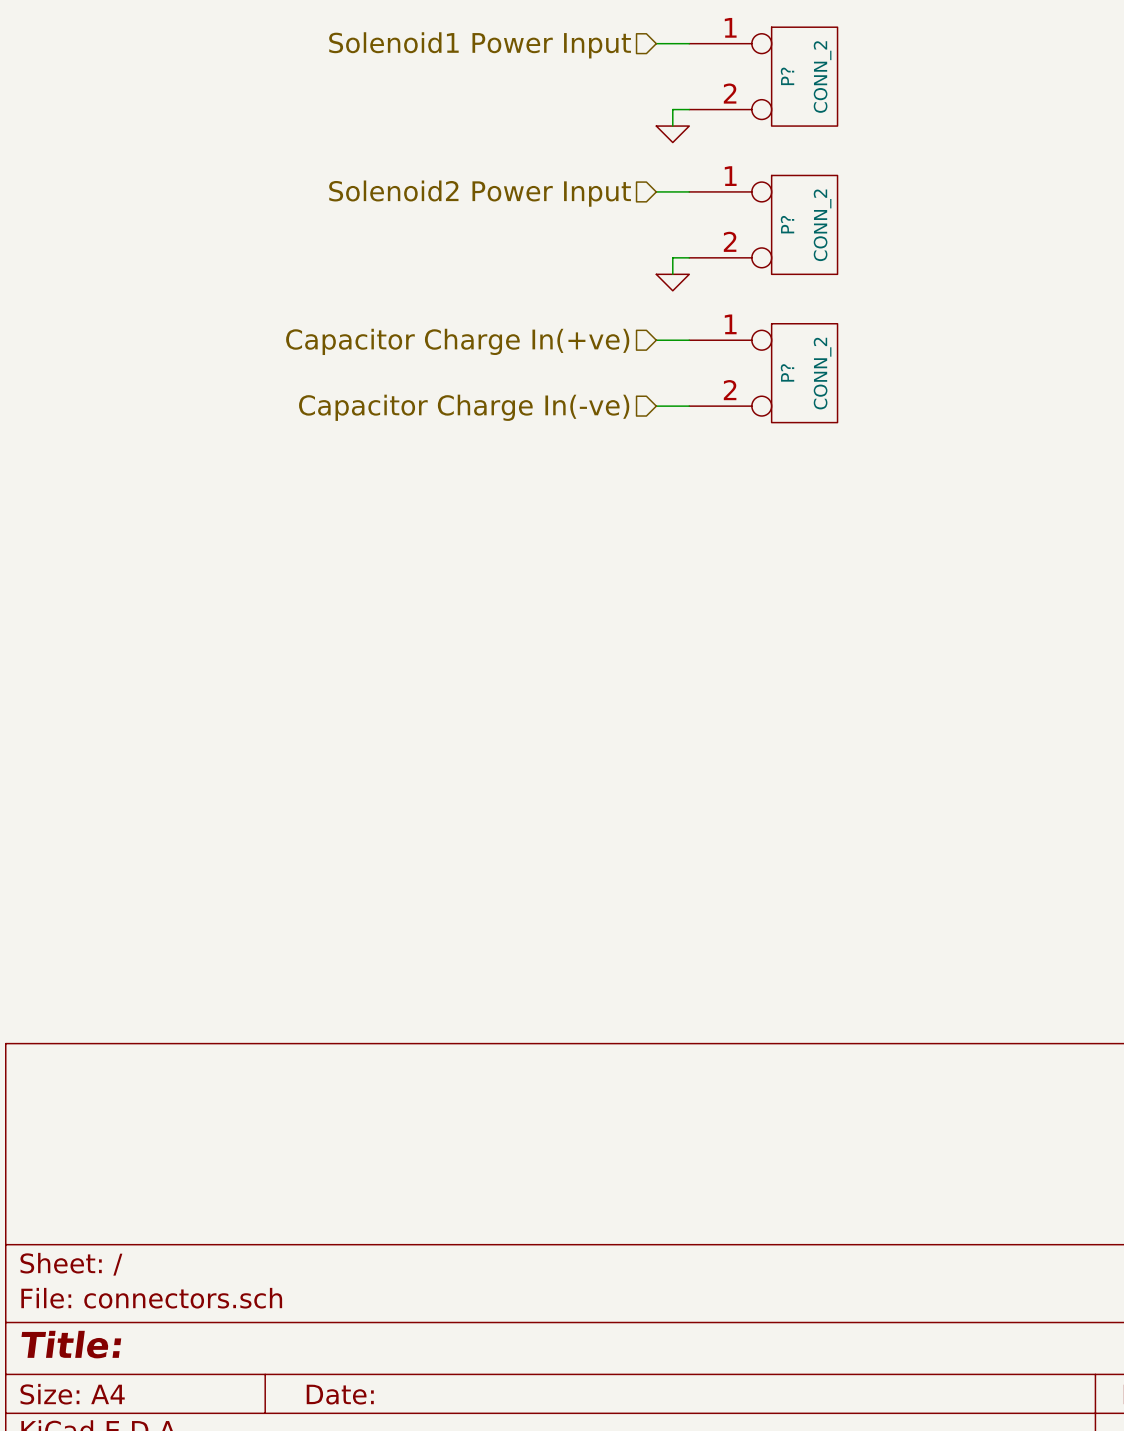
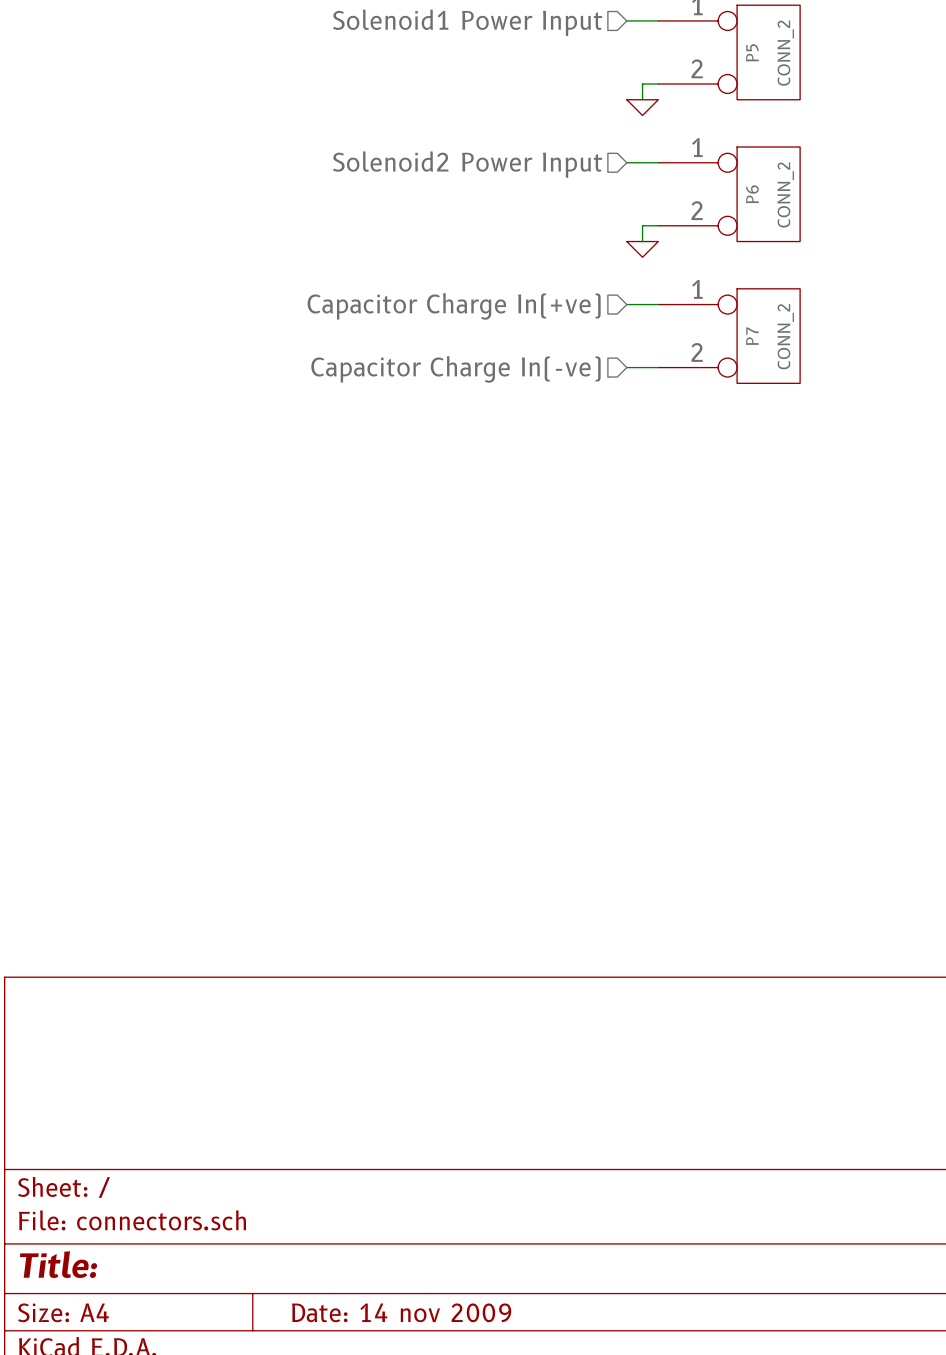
P? name: P? (787, 76) -> P5 (752, 52)
P? name: P? (787, 224) -> P6 (752, 194)
P? name: P? (787, 372) -> P7 (752, 336)
title block: Date: (340, 1394) -> Date: 14 nov 2009 (401, 1312)

